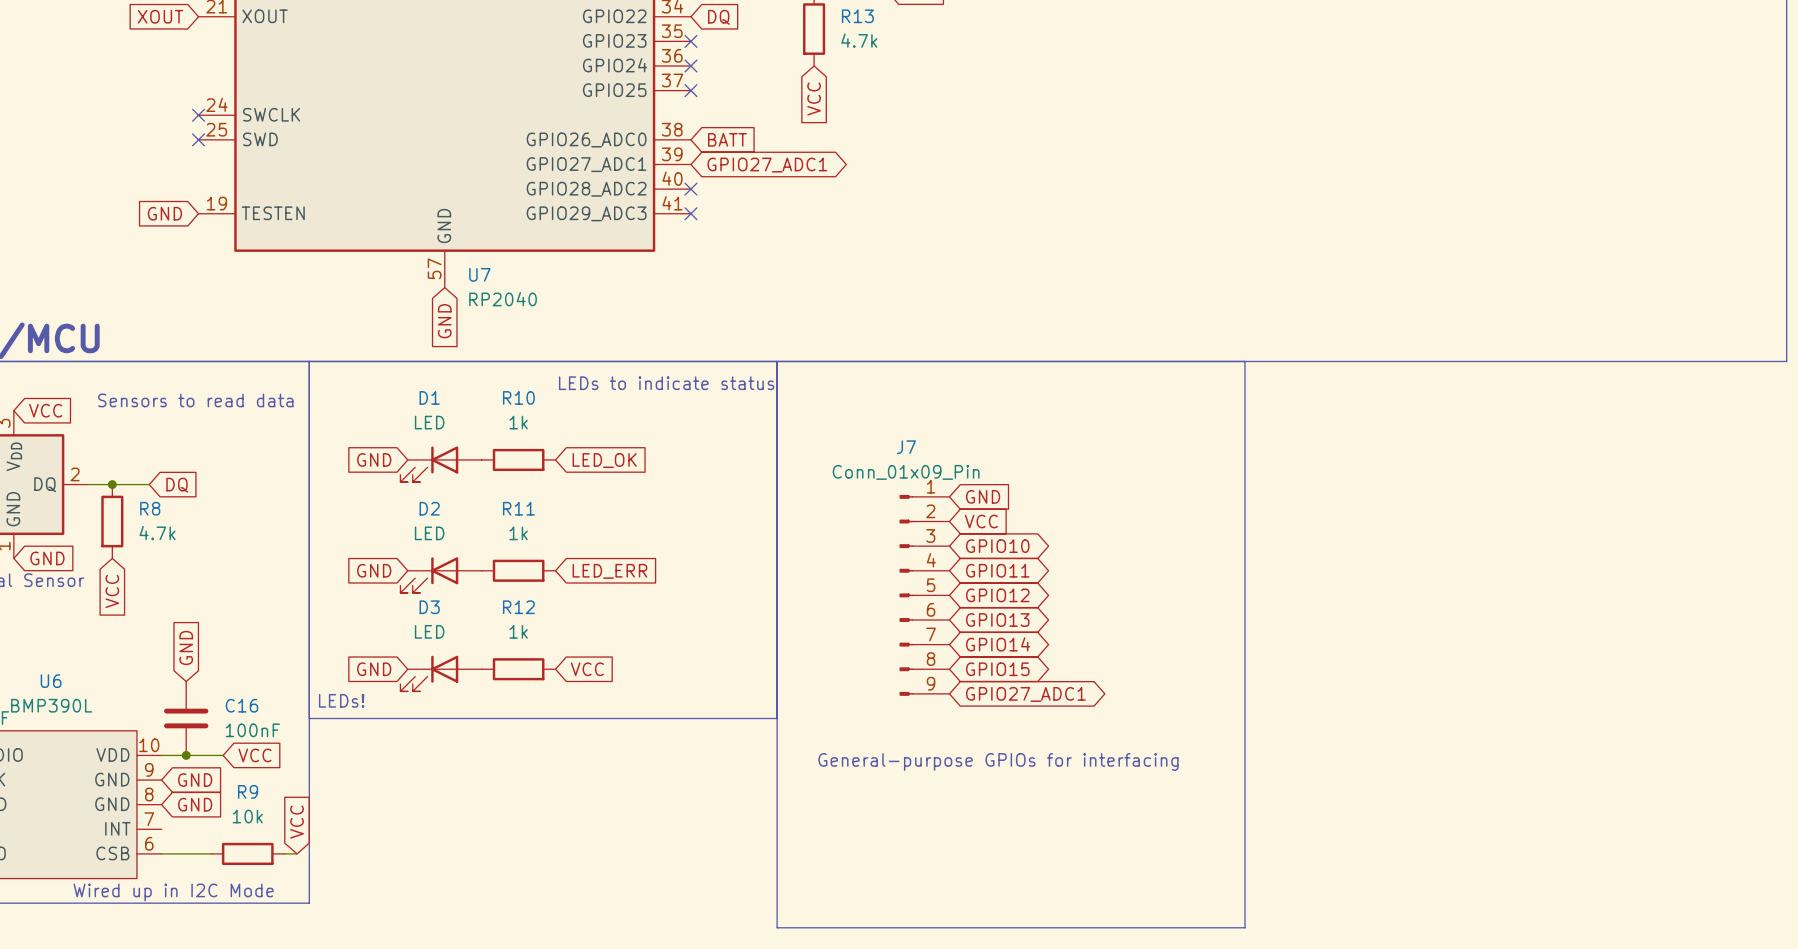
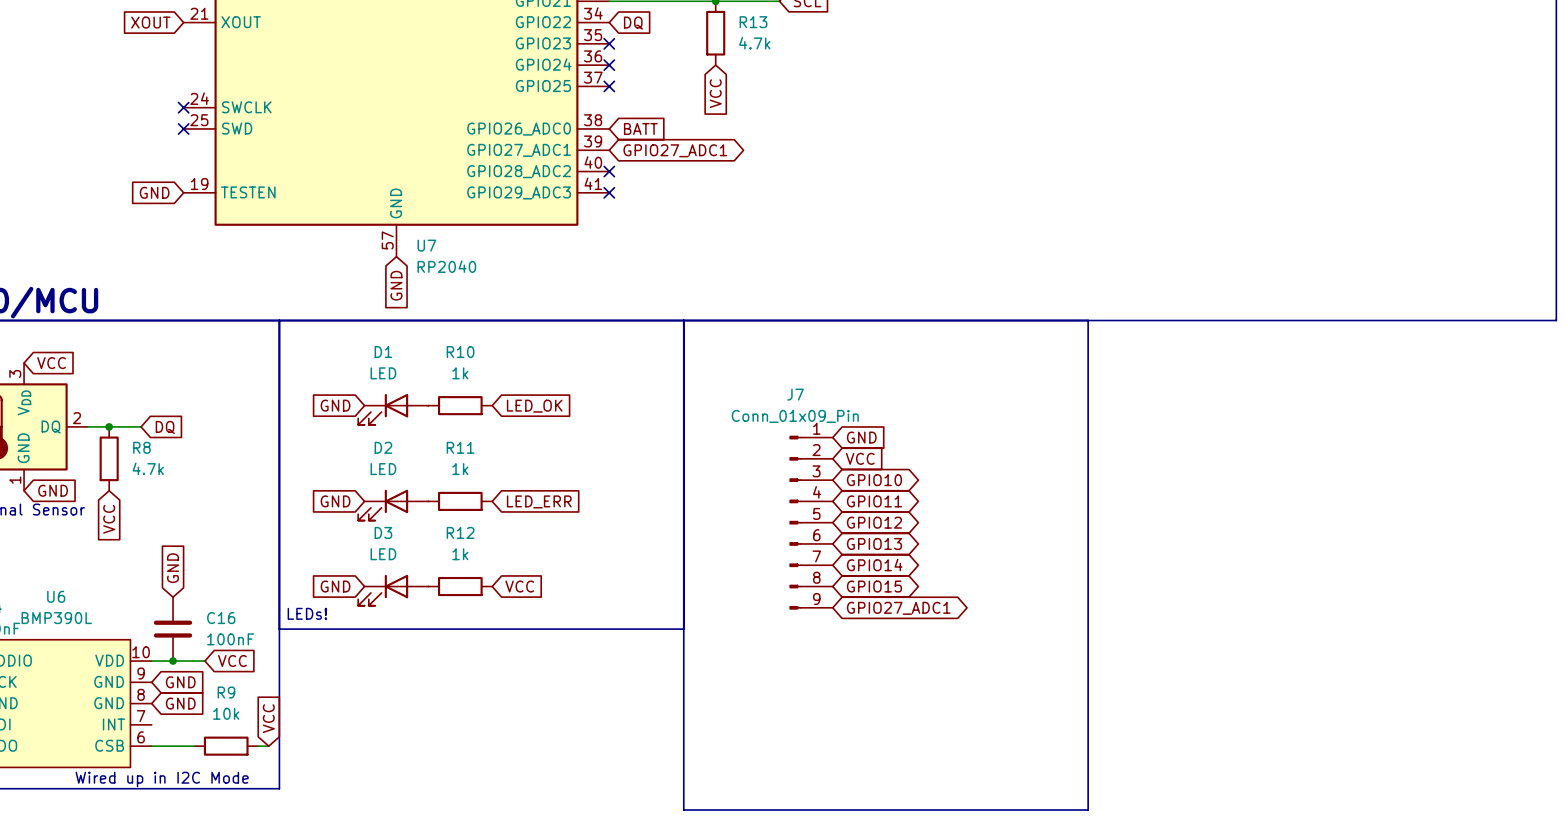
text: LEDs to indicate status (666, 383) -> none
text: Sensors to read data (195, 400) -> none
text: General-purpose GPIOs for interfacing (998, 761) -> none

